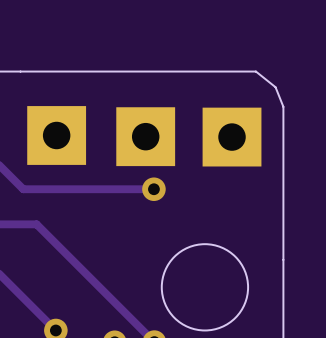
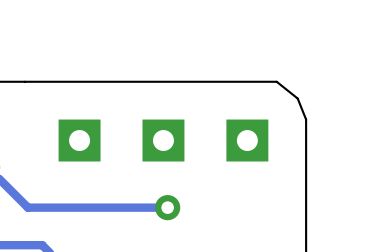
part footprint: [27, 106, 87, 165] -> [58, 119, 101, 162]
part footprint: [116, 107, 176, 167] -> [142, 119, 185, 162]
part footprint: [202, 107, 262, 167] -> [226, 119, 269, 162]

